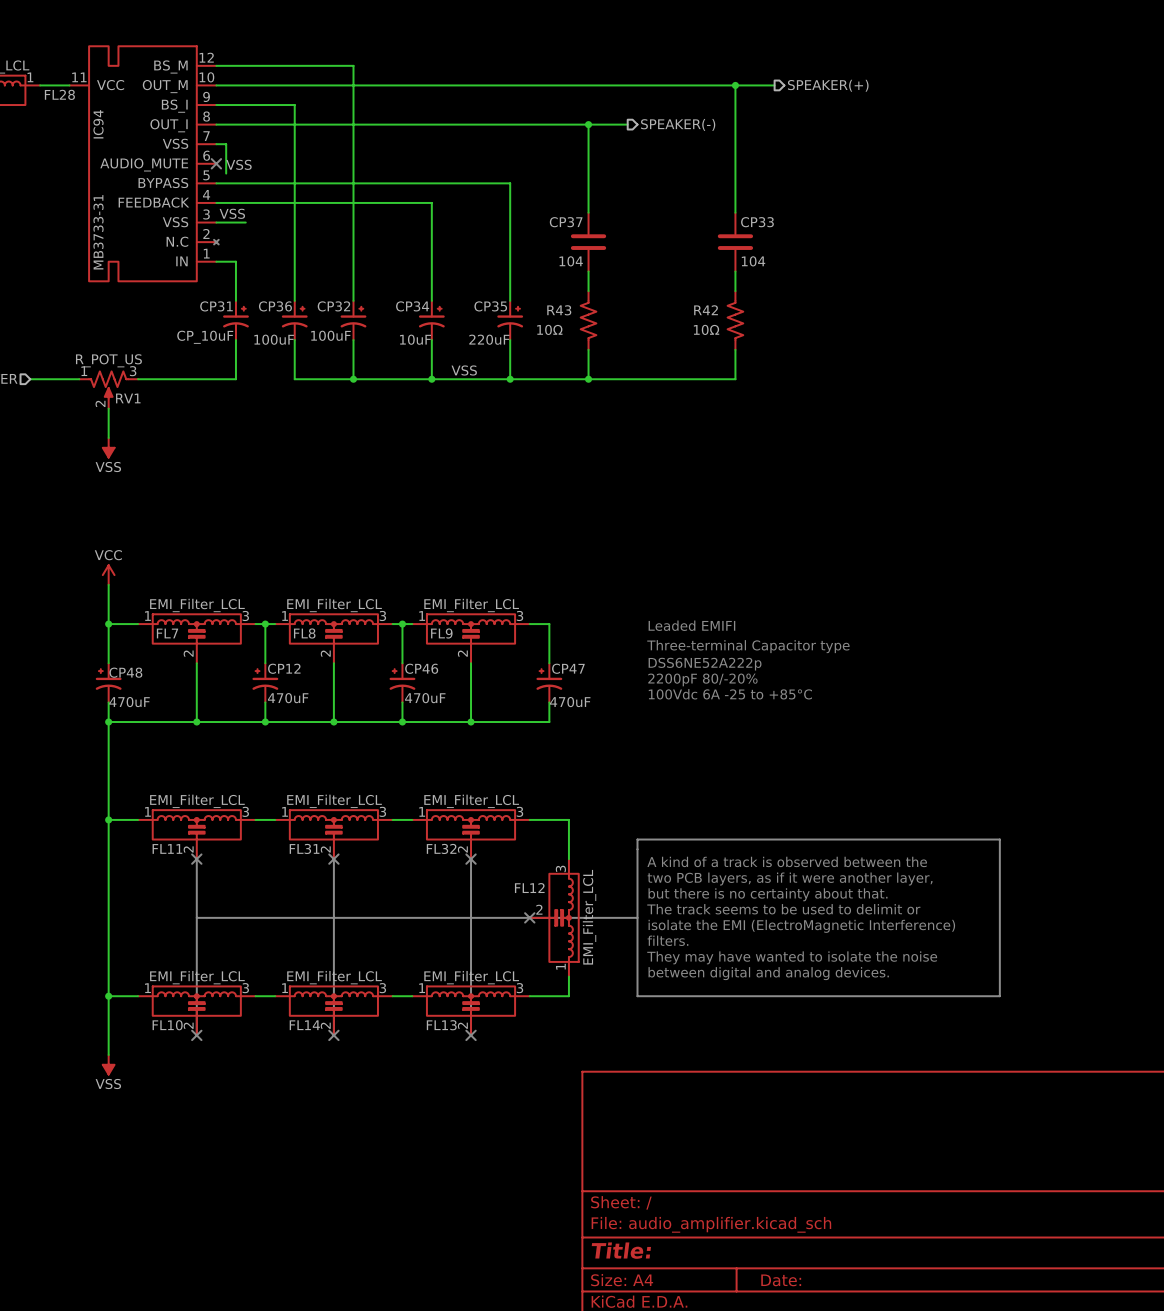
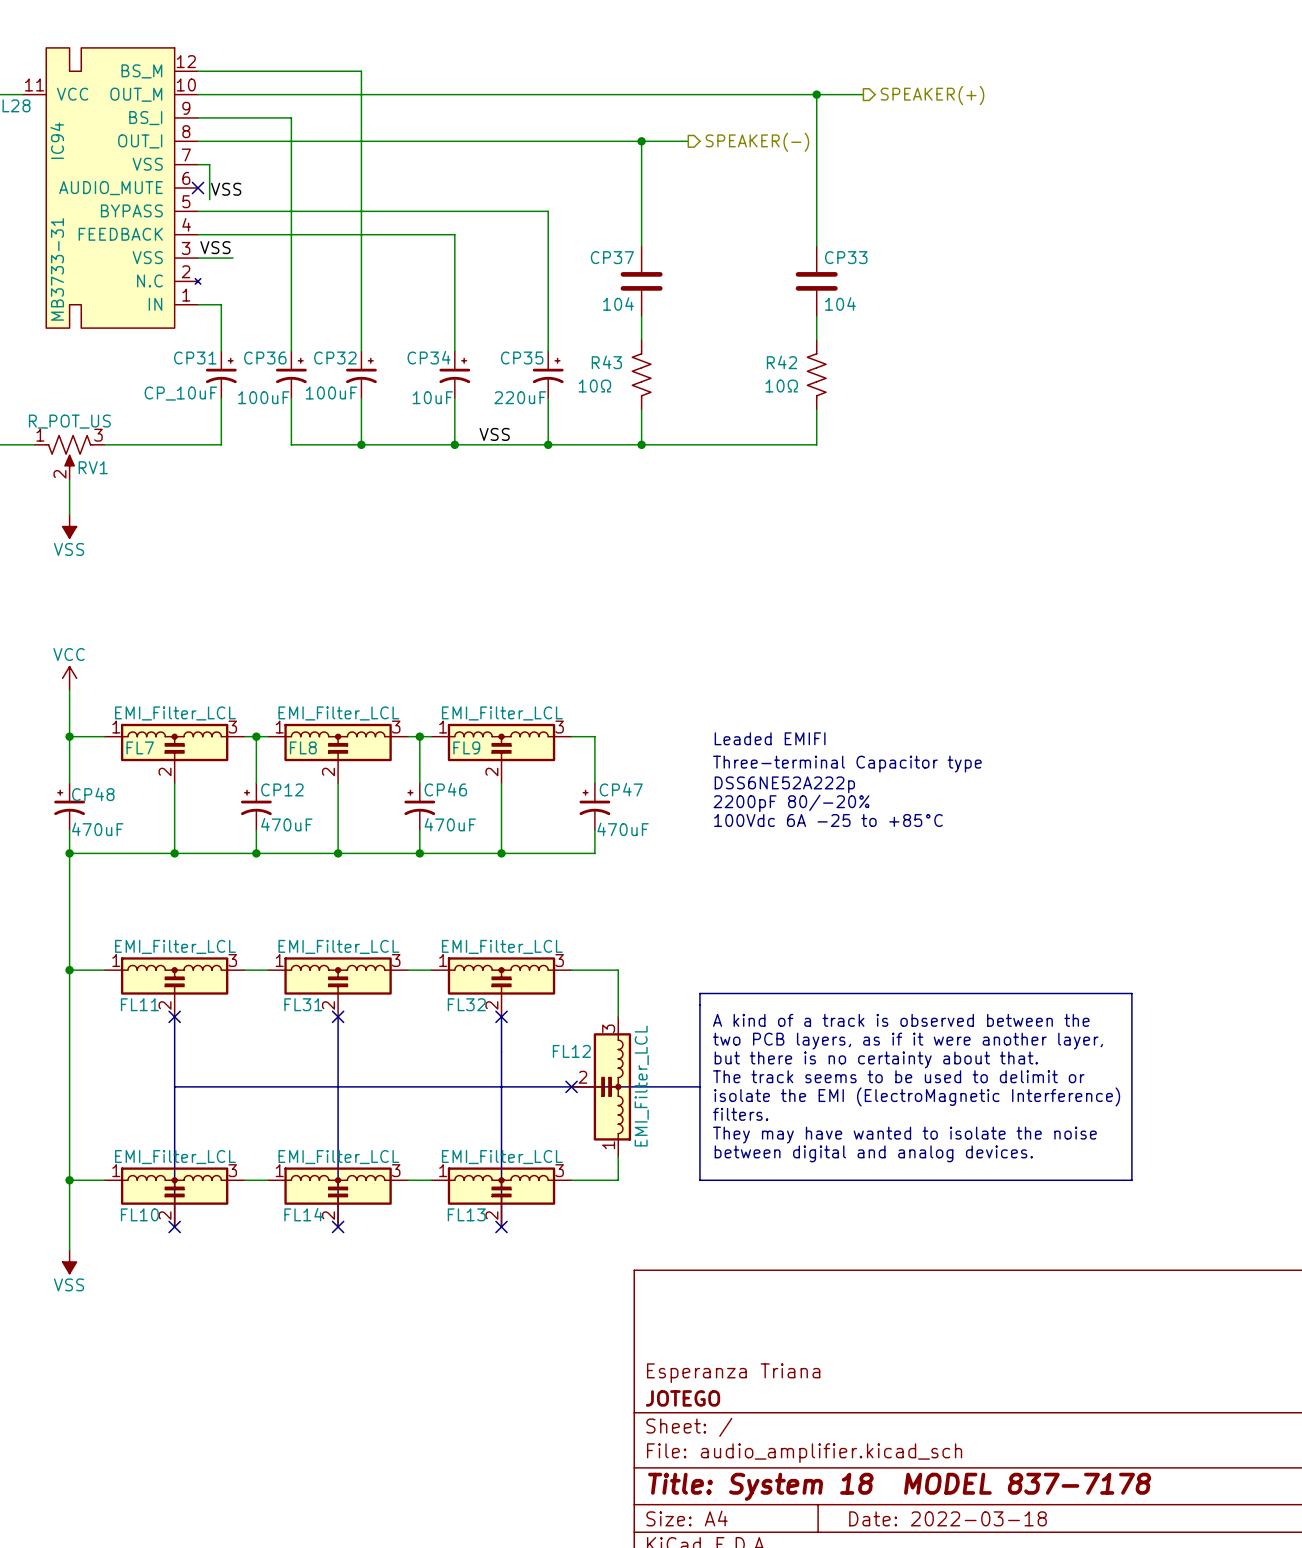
title block: none -> Esperanza Triana (733, 1373)
title block: none -> JOTEGO (683, 1398)
title block: Title: (621, 1250) -> Title: System 18 MODEL 837-7178 (899, 1486)
title block: Date: (781, 1280) -> Date: 2022-03-18 (948, 1518)

